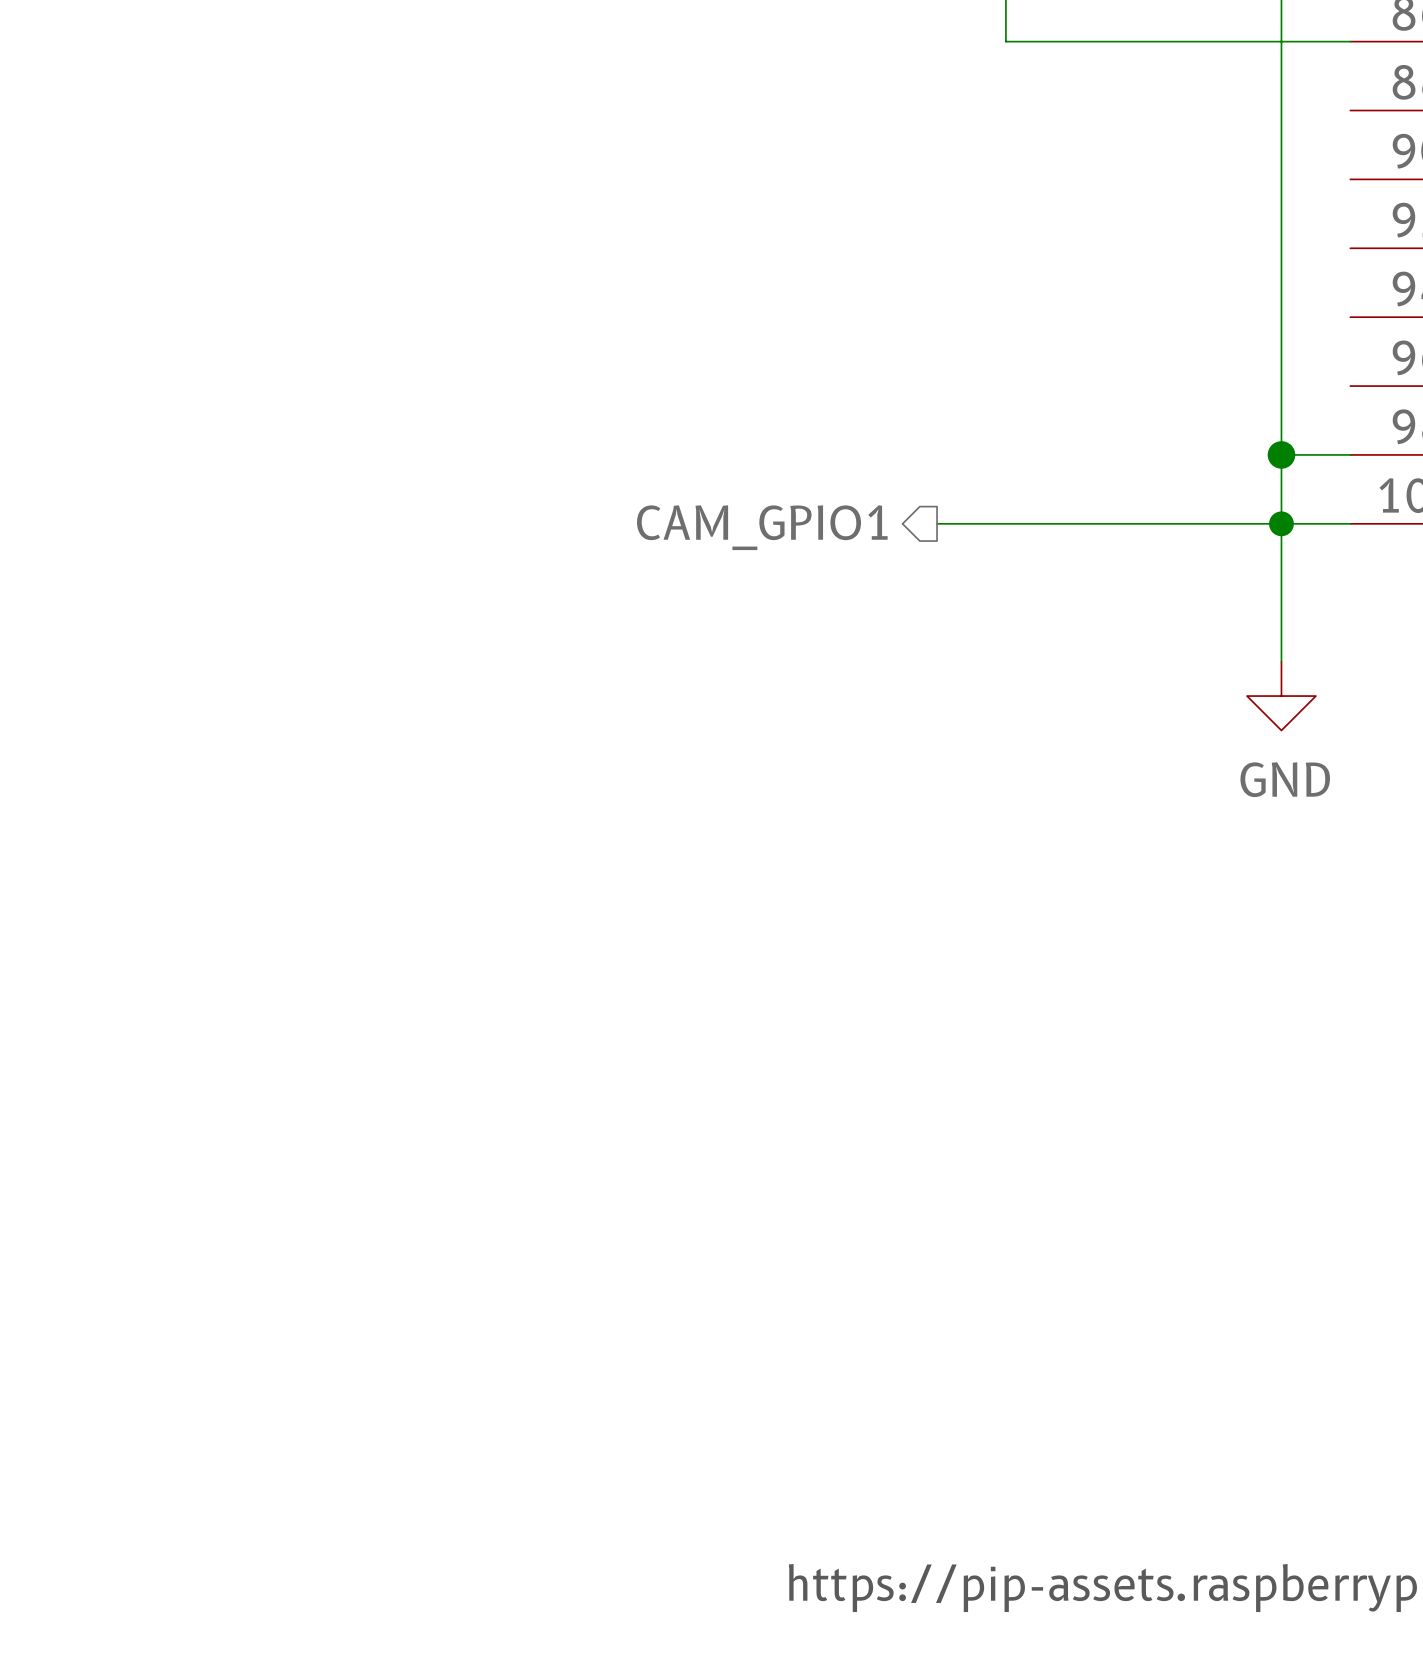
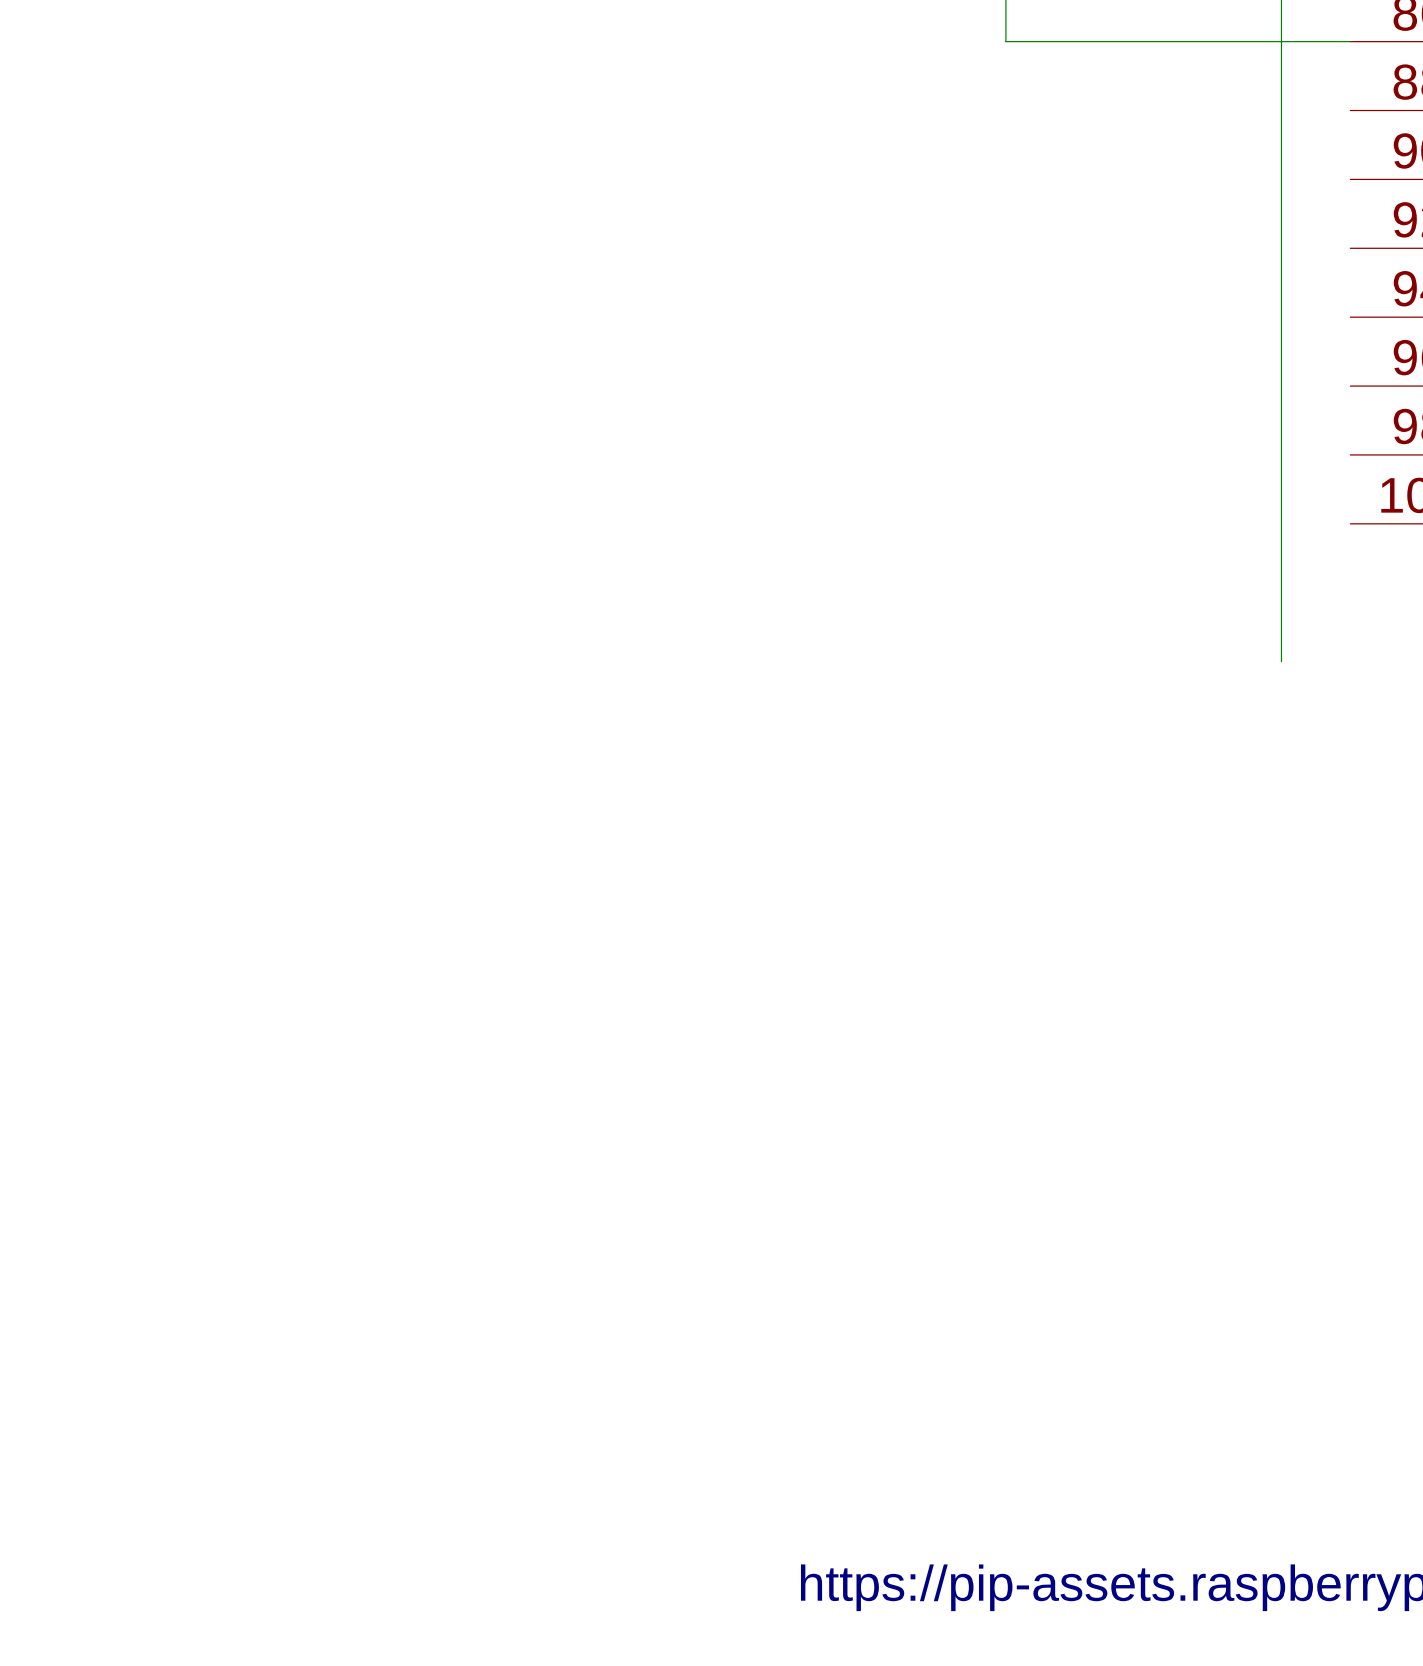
wire: (1281, 454) (1350, 454) -> none
junction: (1281, 454) -> none
wire: (937, 523) (1350, 523) -> none
junction: (1281, 523) -> none
hierarchical label: CAM_GPIO1 (762, 527) -> none
power symbol: GND (1281, 696) -> none

